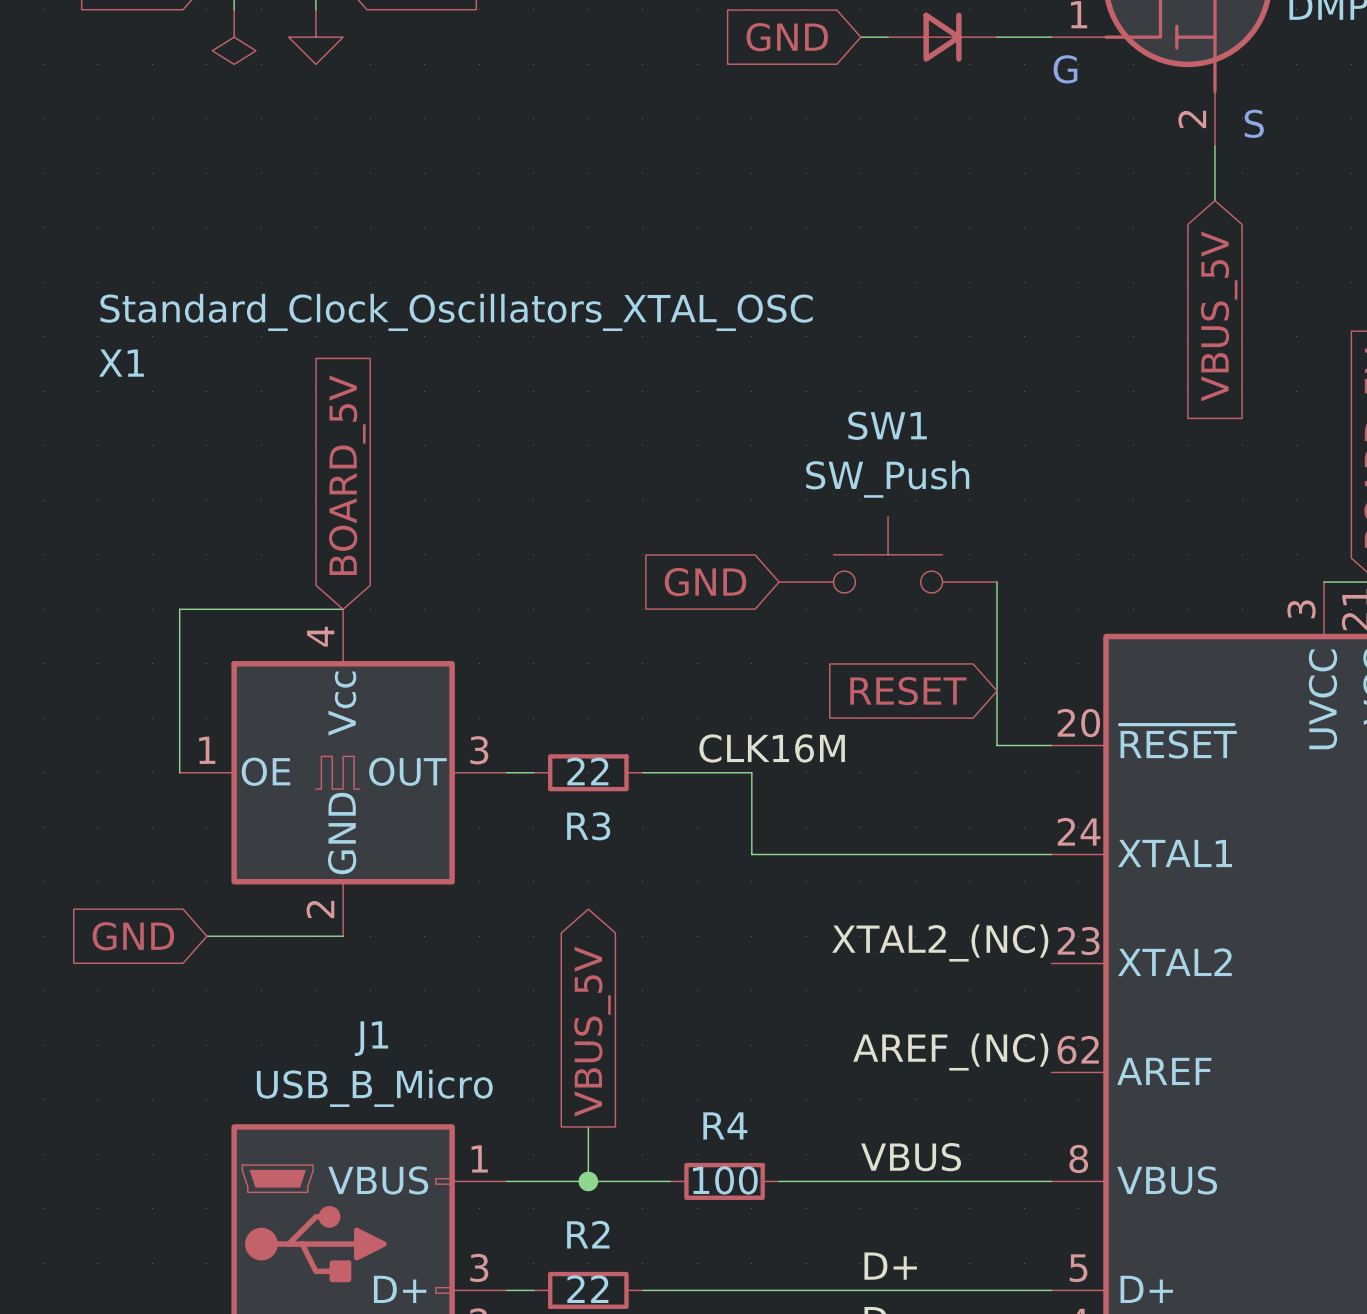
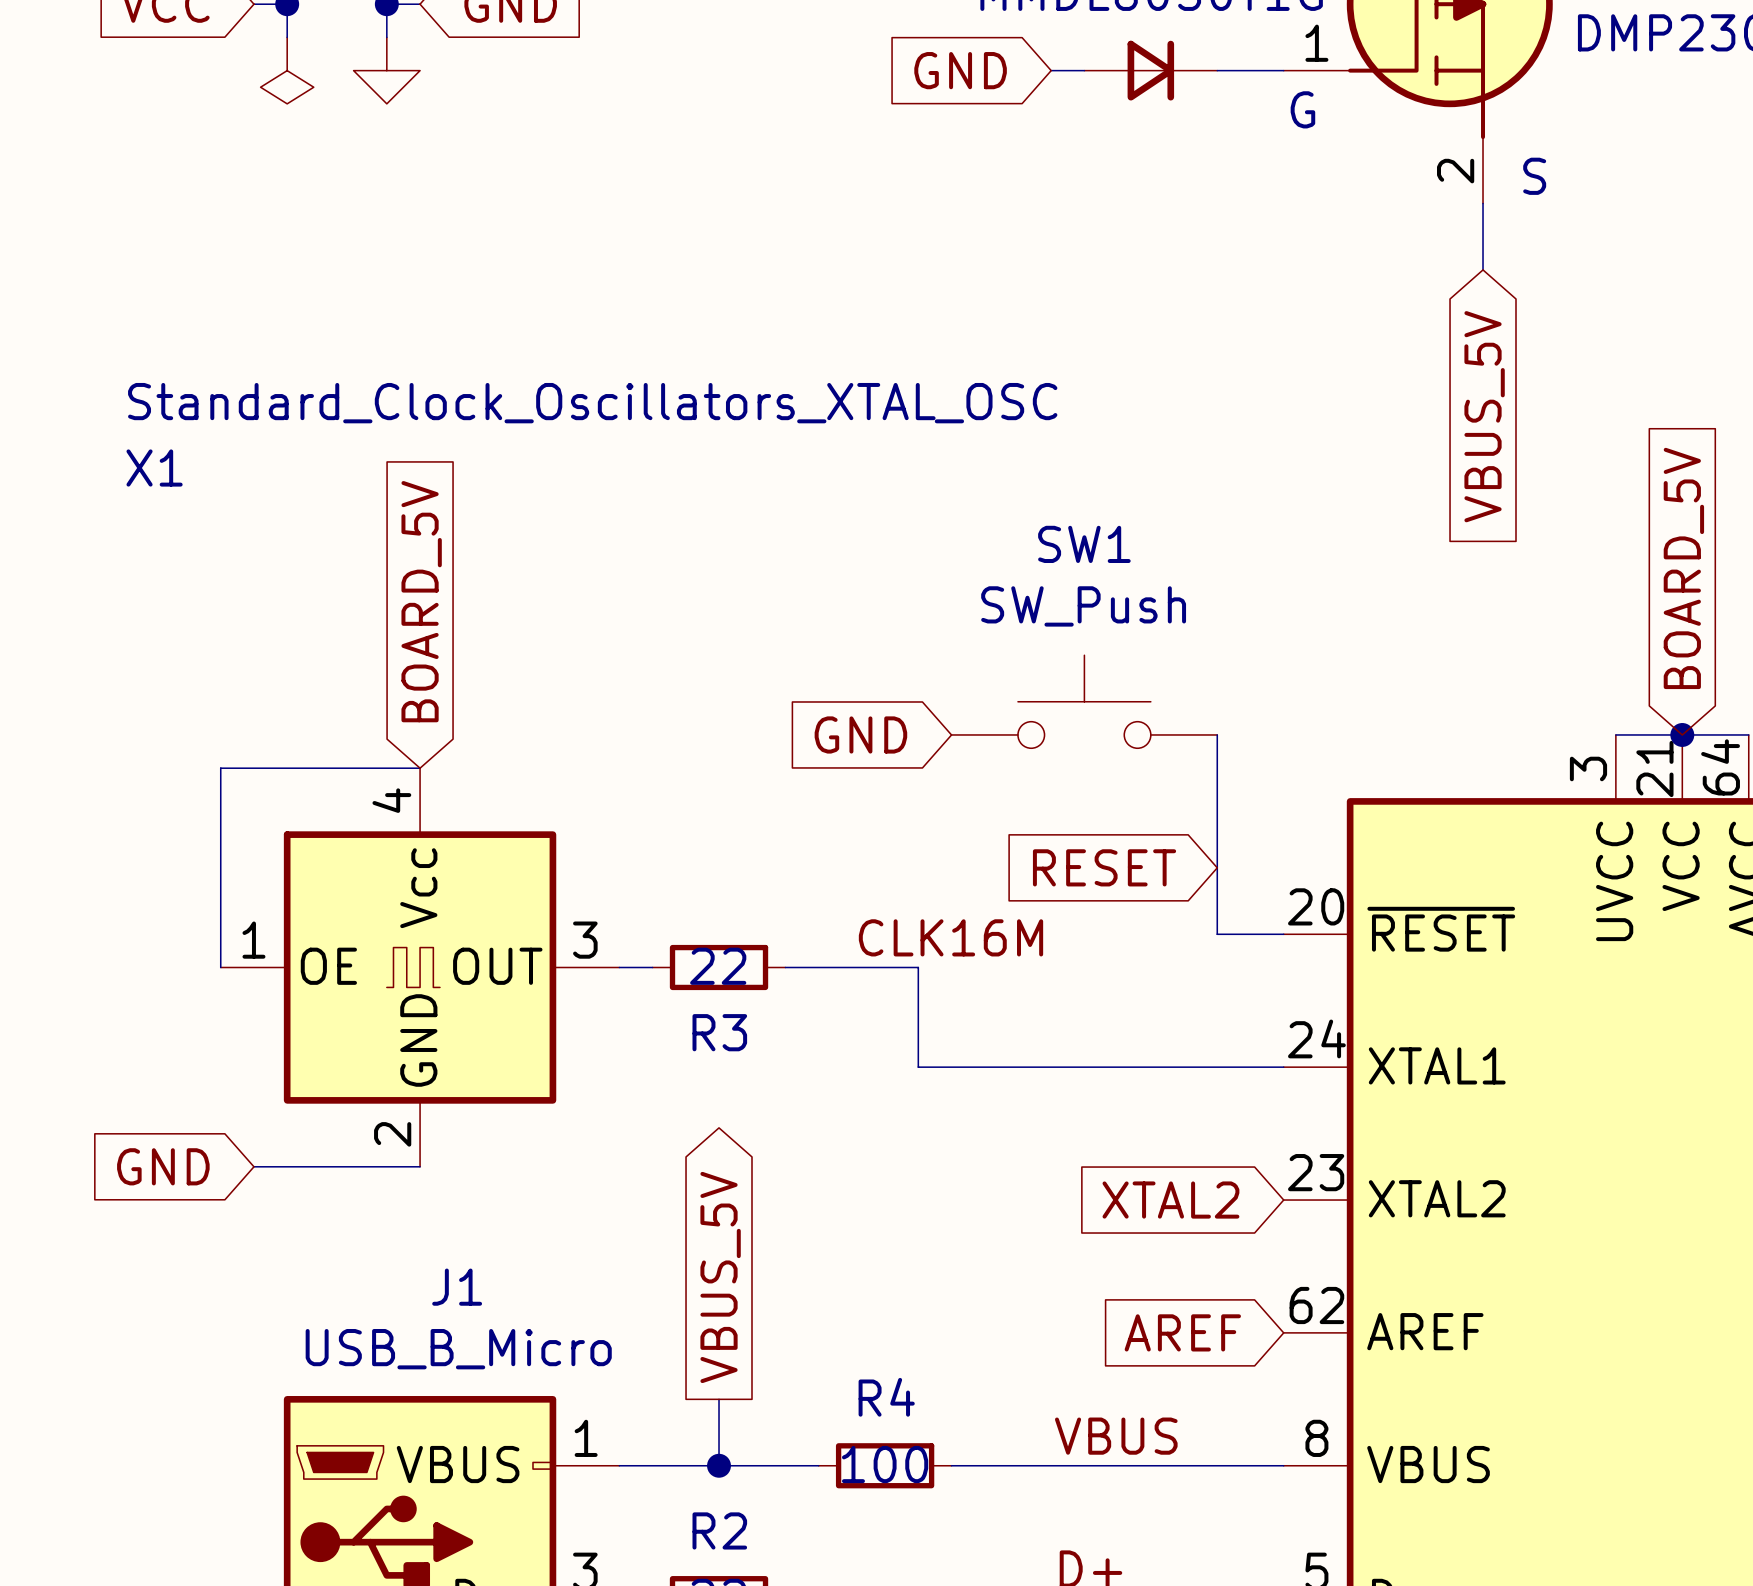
label: XTAL2_(NC) (940, 943) -> none
global label: none -> XTAL2 (1170, 1200)
label: AREF_(NC) (950, 1051) -> none
global label: none -> AREF (1182, 1332)

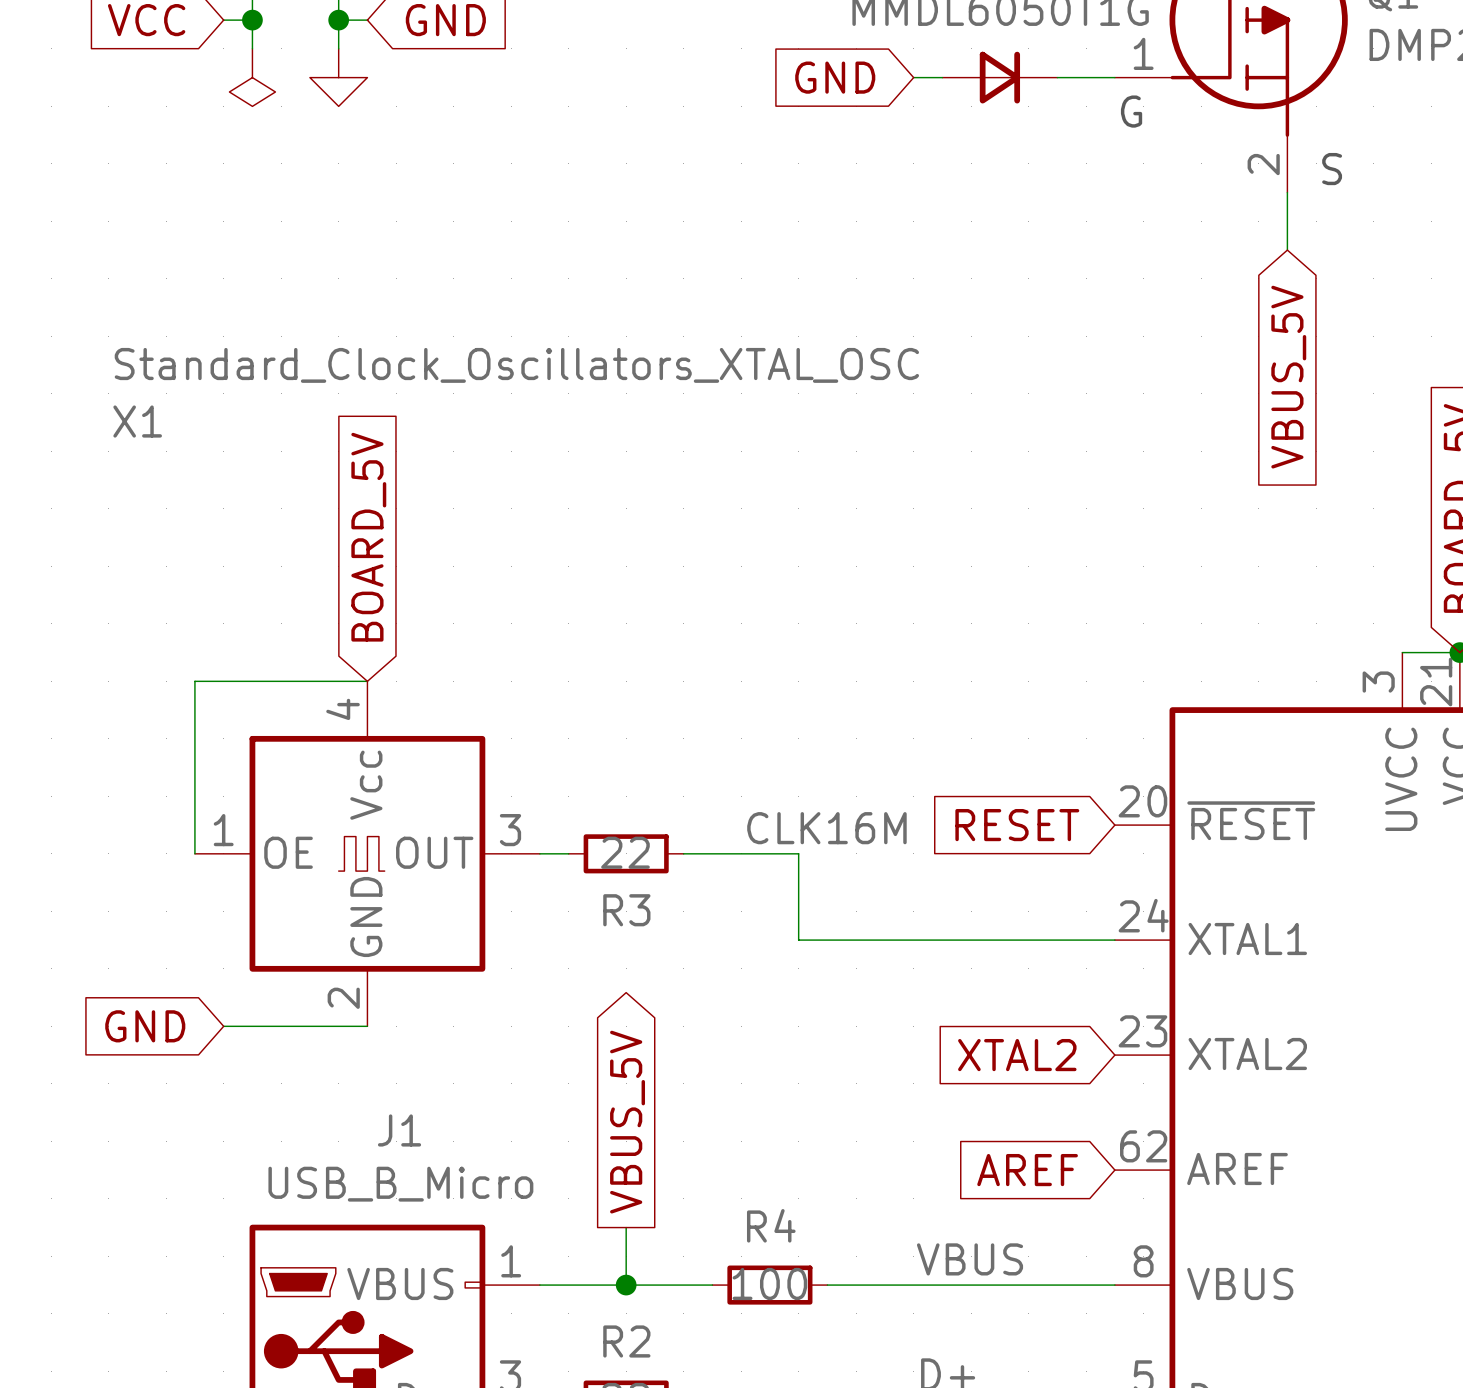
SW1: SW_Push (1084, 701) -> none
global label: GND (860, 734) -> none
wire: (1217, 734) (1217, 934) (1283, 934) -> none
global label position: RESET (1104, 867) -> RESET (1017, 825)

